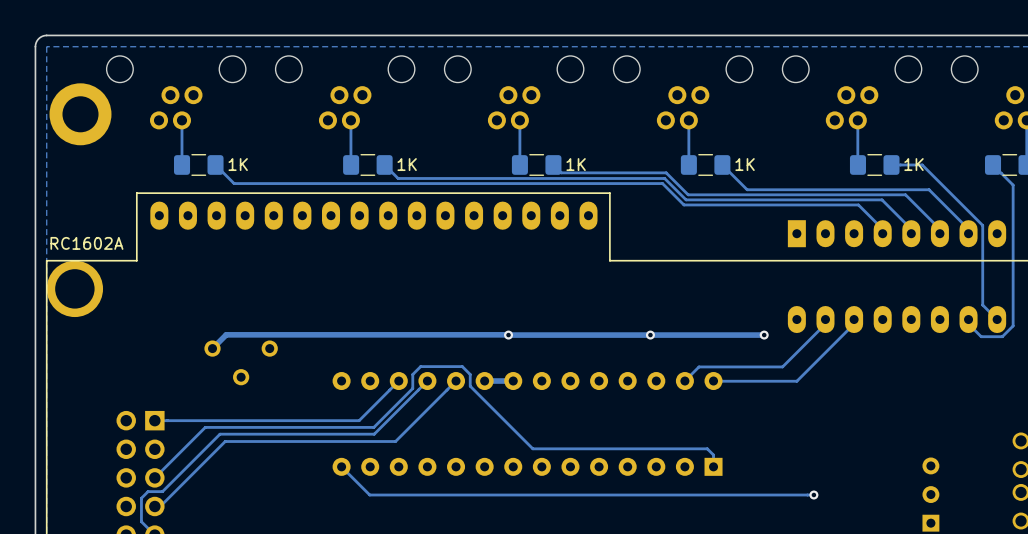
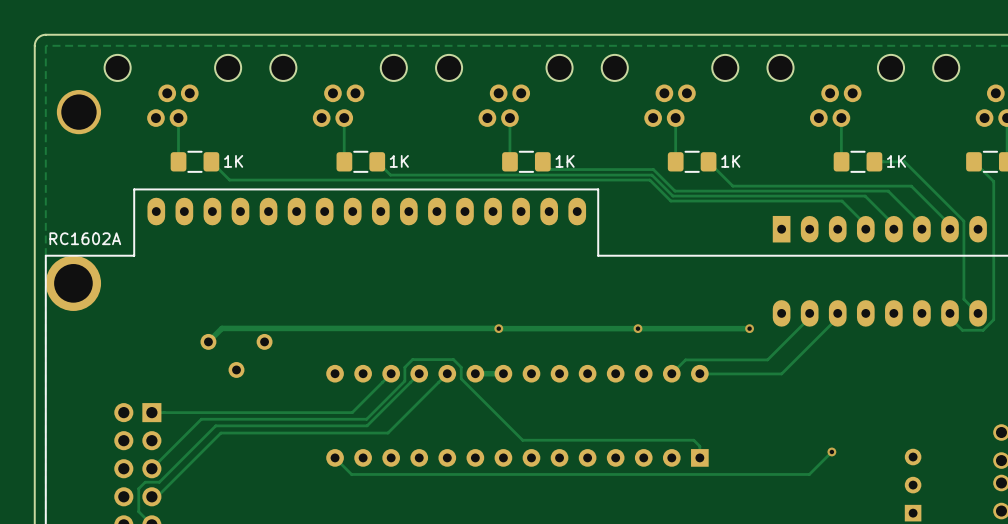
part footprint: [49, 83, 112, 146] -> [56, 90, 102, 135]
track: (358, 483) (369, 495) (813, 495) -> (351, 474) (809, 474) (831, 451)
via position: (813, 495) -> (831, 451)

